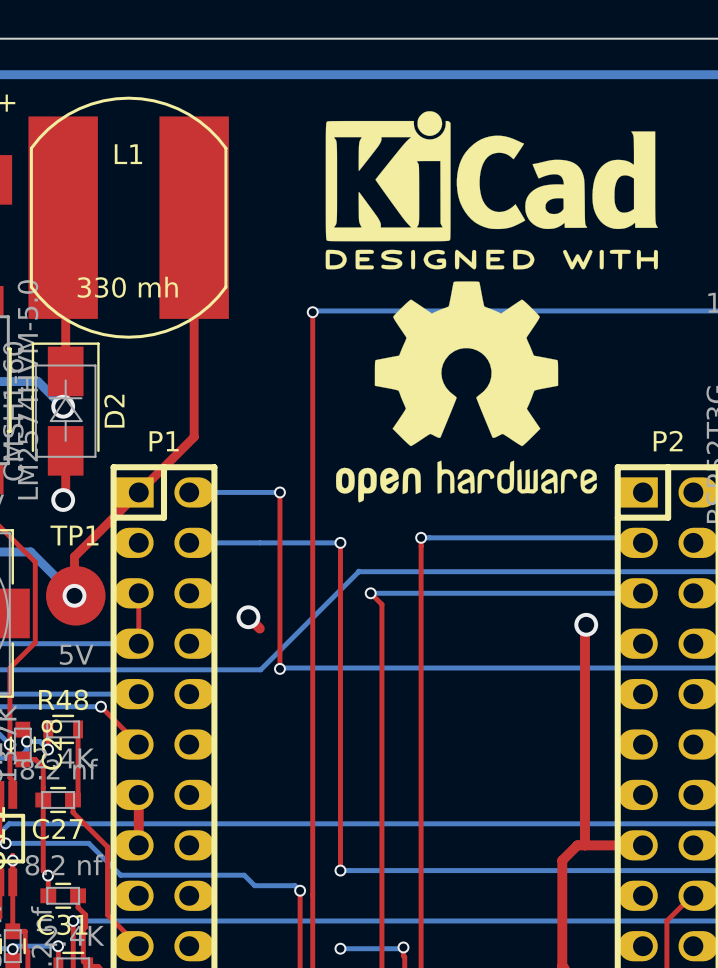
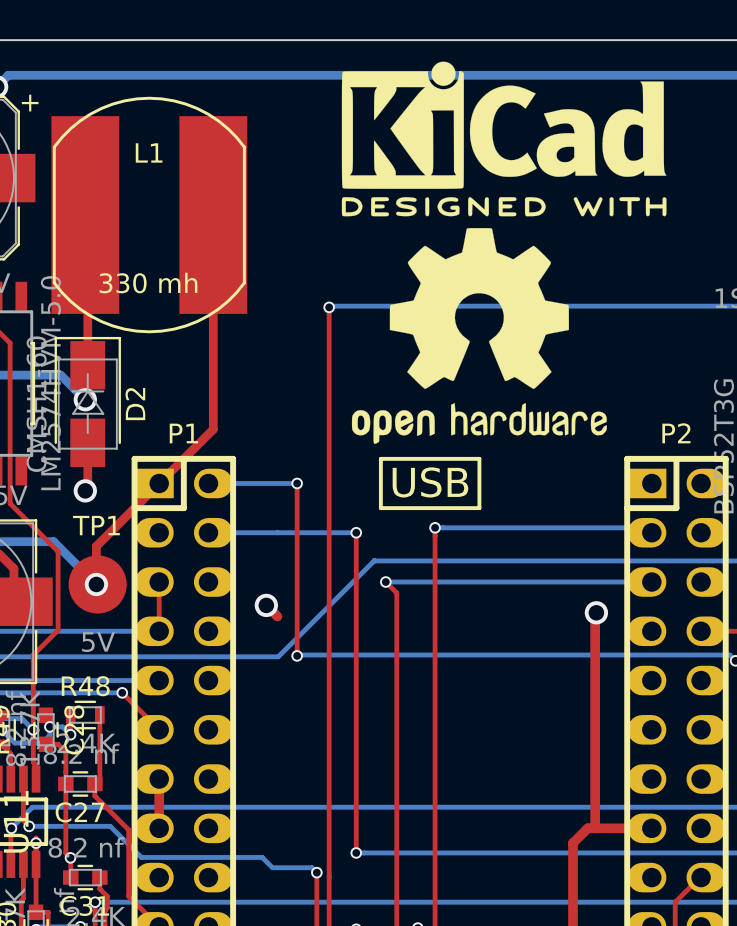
drawing position: (491, 190) -> (504, 138)
drawing position: (466, 391) -> (479, 335)
line: none -> (380, 458) (380, 508) (479, 508) (479, 458) (380, 458)
text: none -> USB (430, 482)

